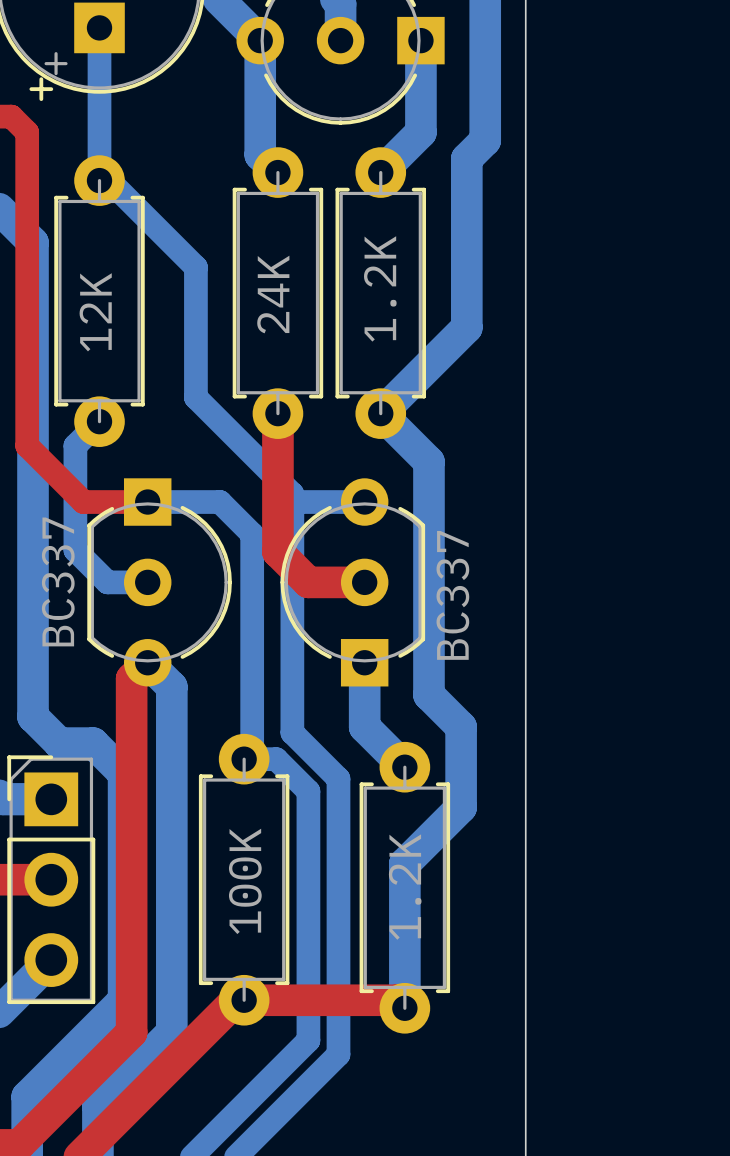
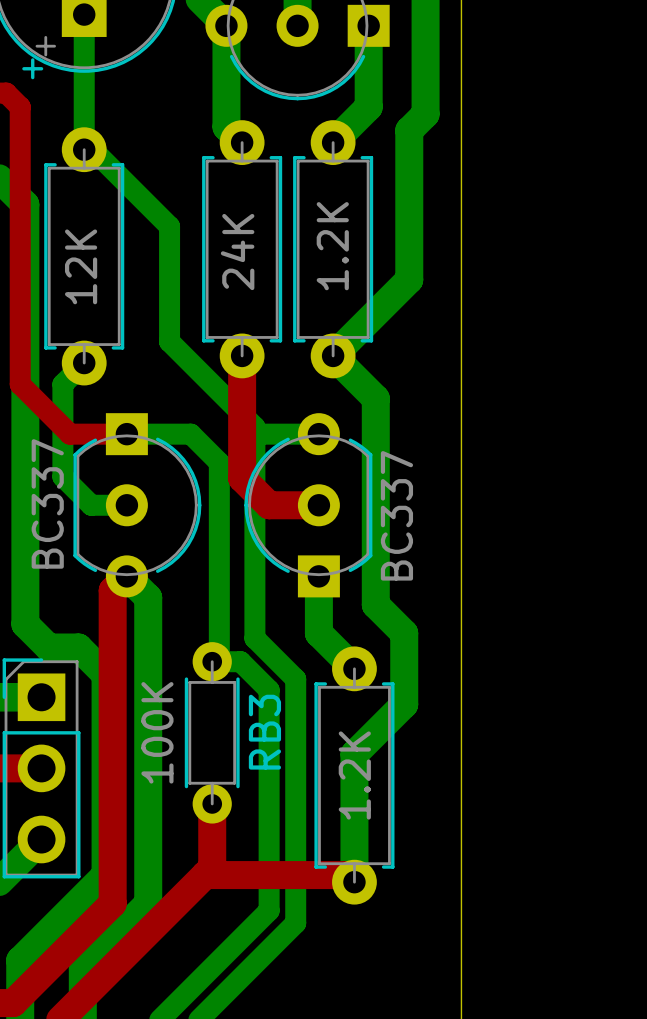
RB3: none -> 100K (212, 732)
part: 100K (244, 879) -> none
top track: none -> (212, 803) (212, 867) (205, 875)

